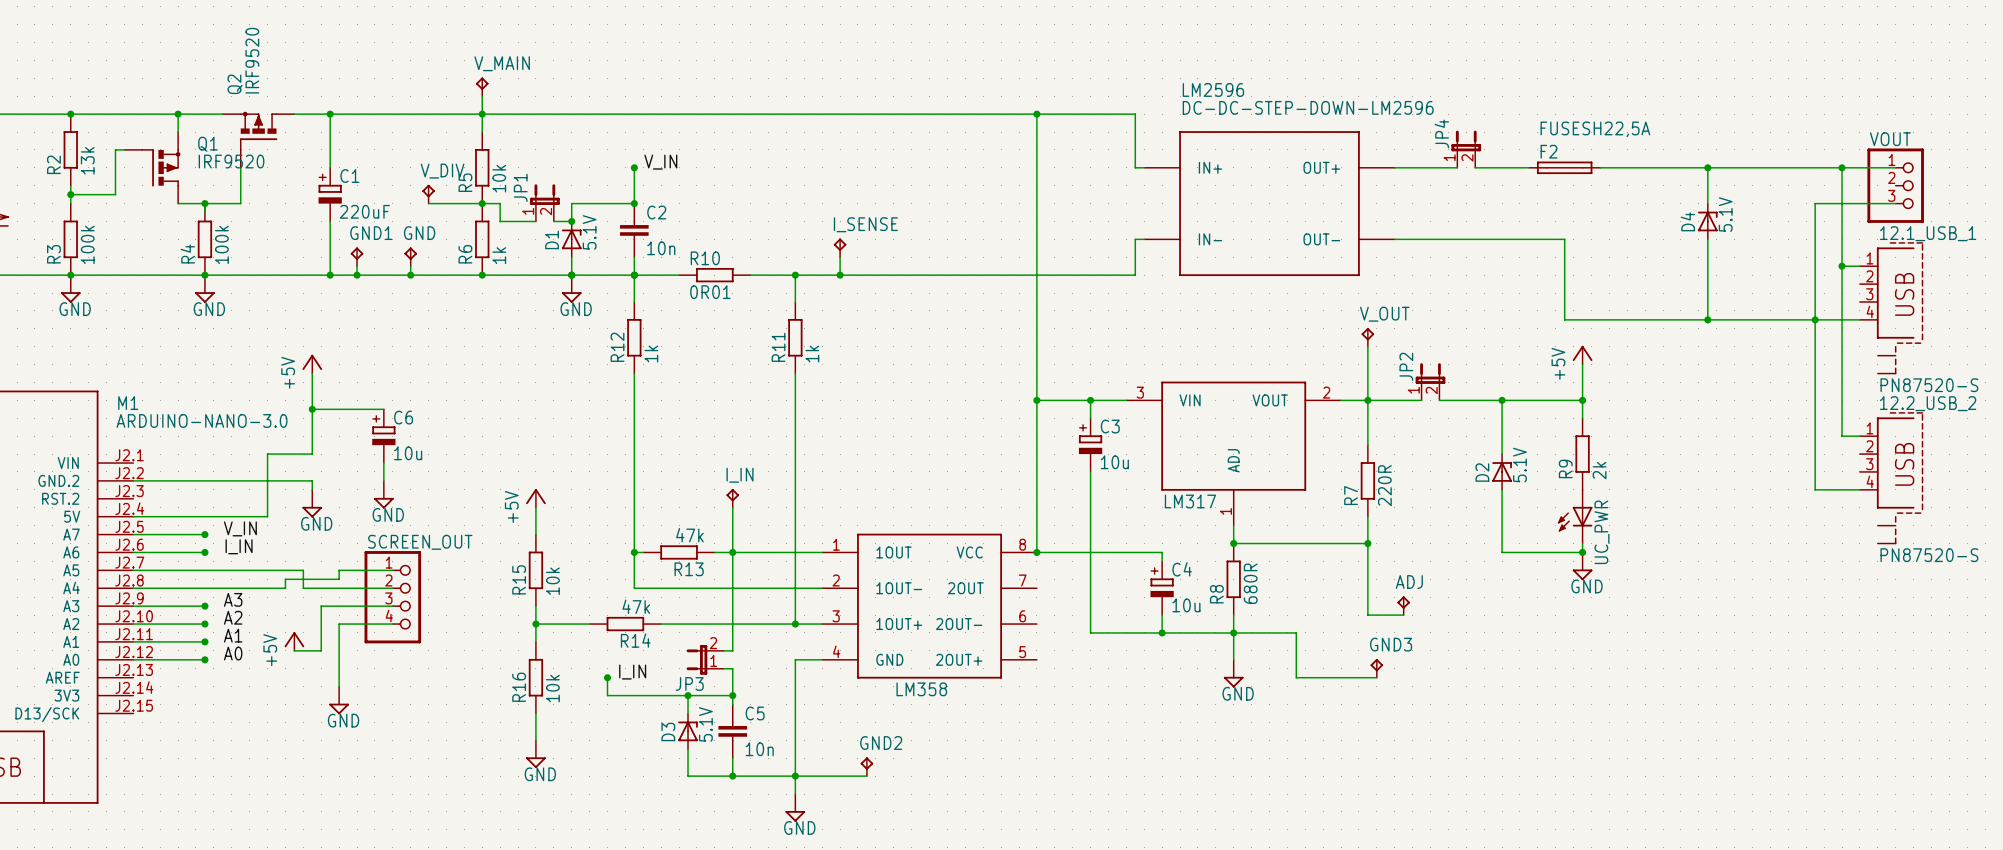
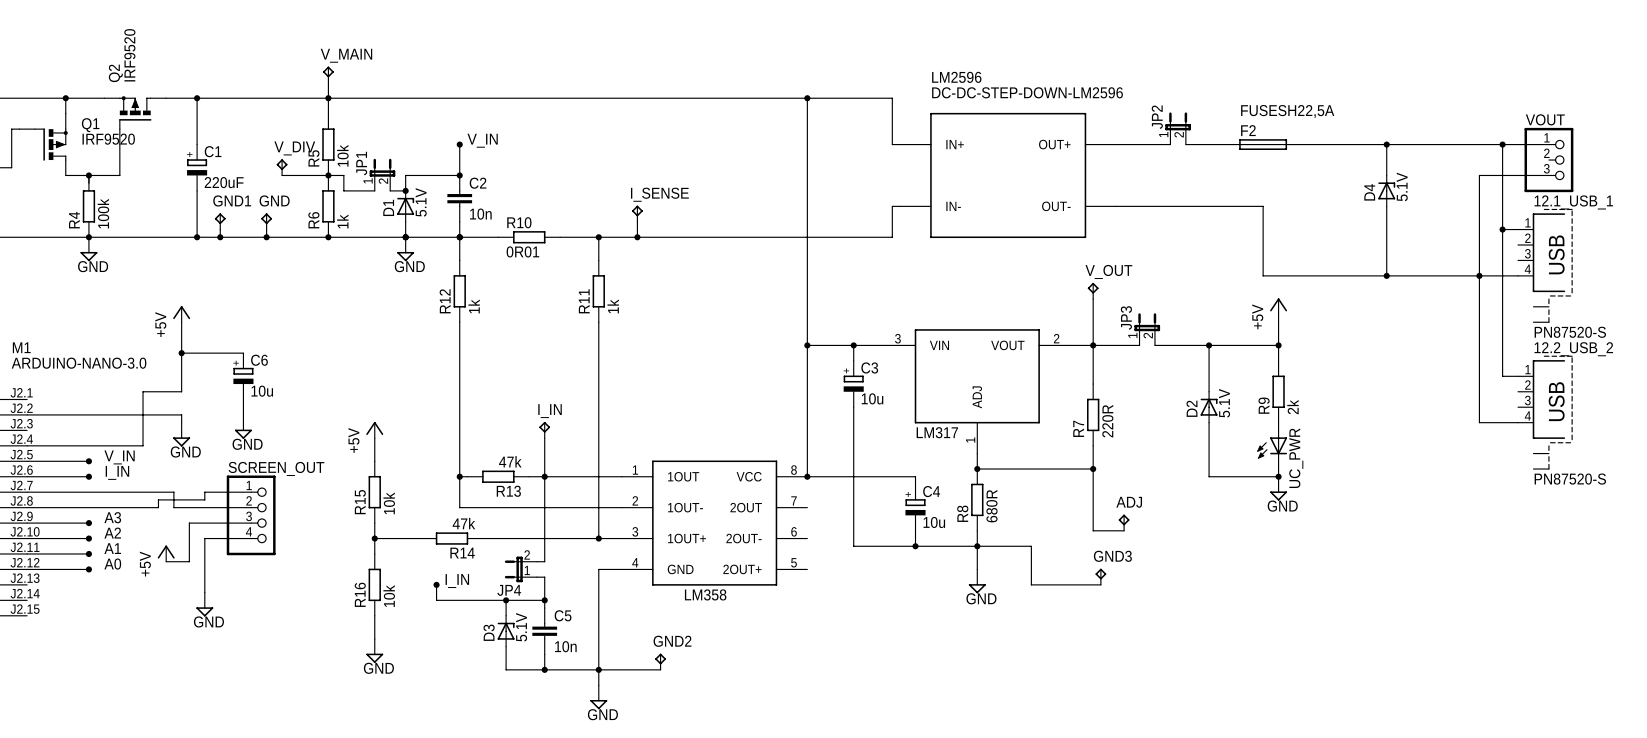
JP4 name: JP4 (1441, 133) -> JP2 (1157, 117)
JP2 name: JP2 (1406, 366) -> JP3 (1126, 317)
JP3 name: JP3 (689, 683) -> JP4 (509, 590)

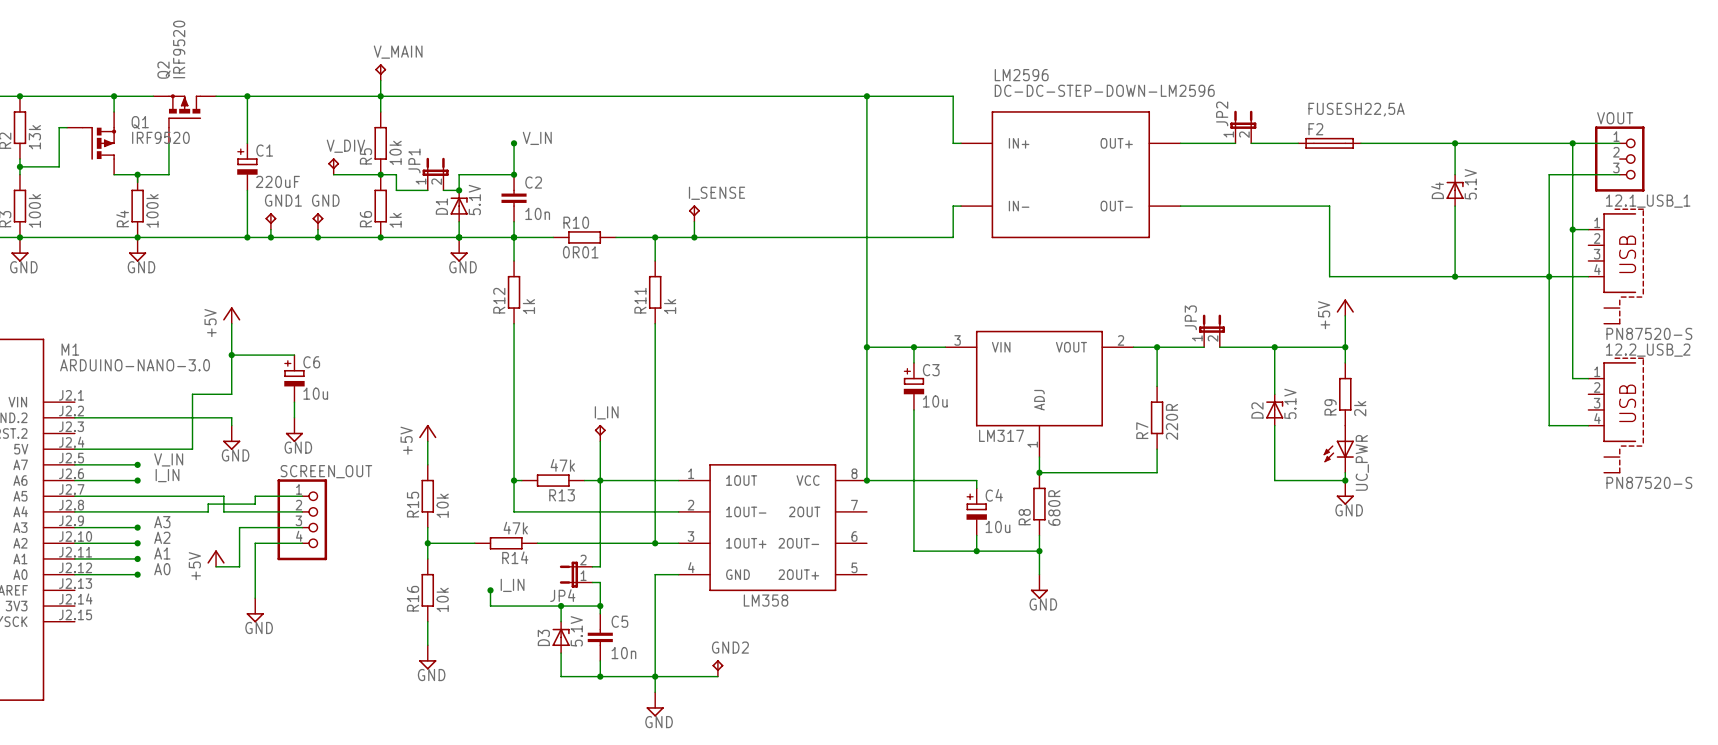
V_OUT: (1093, 290) -> none
wire: (1093, 299) (1093, 345) -> none
wire: (1093, 469) (1093, 530) (1124, 530) -> none
junction: (1093, 469) -> none
ADJ: (1124, 522) -> none
wire: (977, 546) (1031, 546) (1031, 584) (1100, 584) -> none
GND3: (1100, 576) -> none

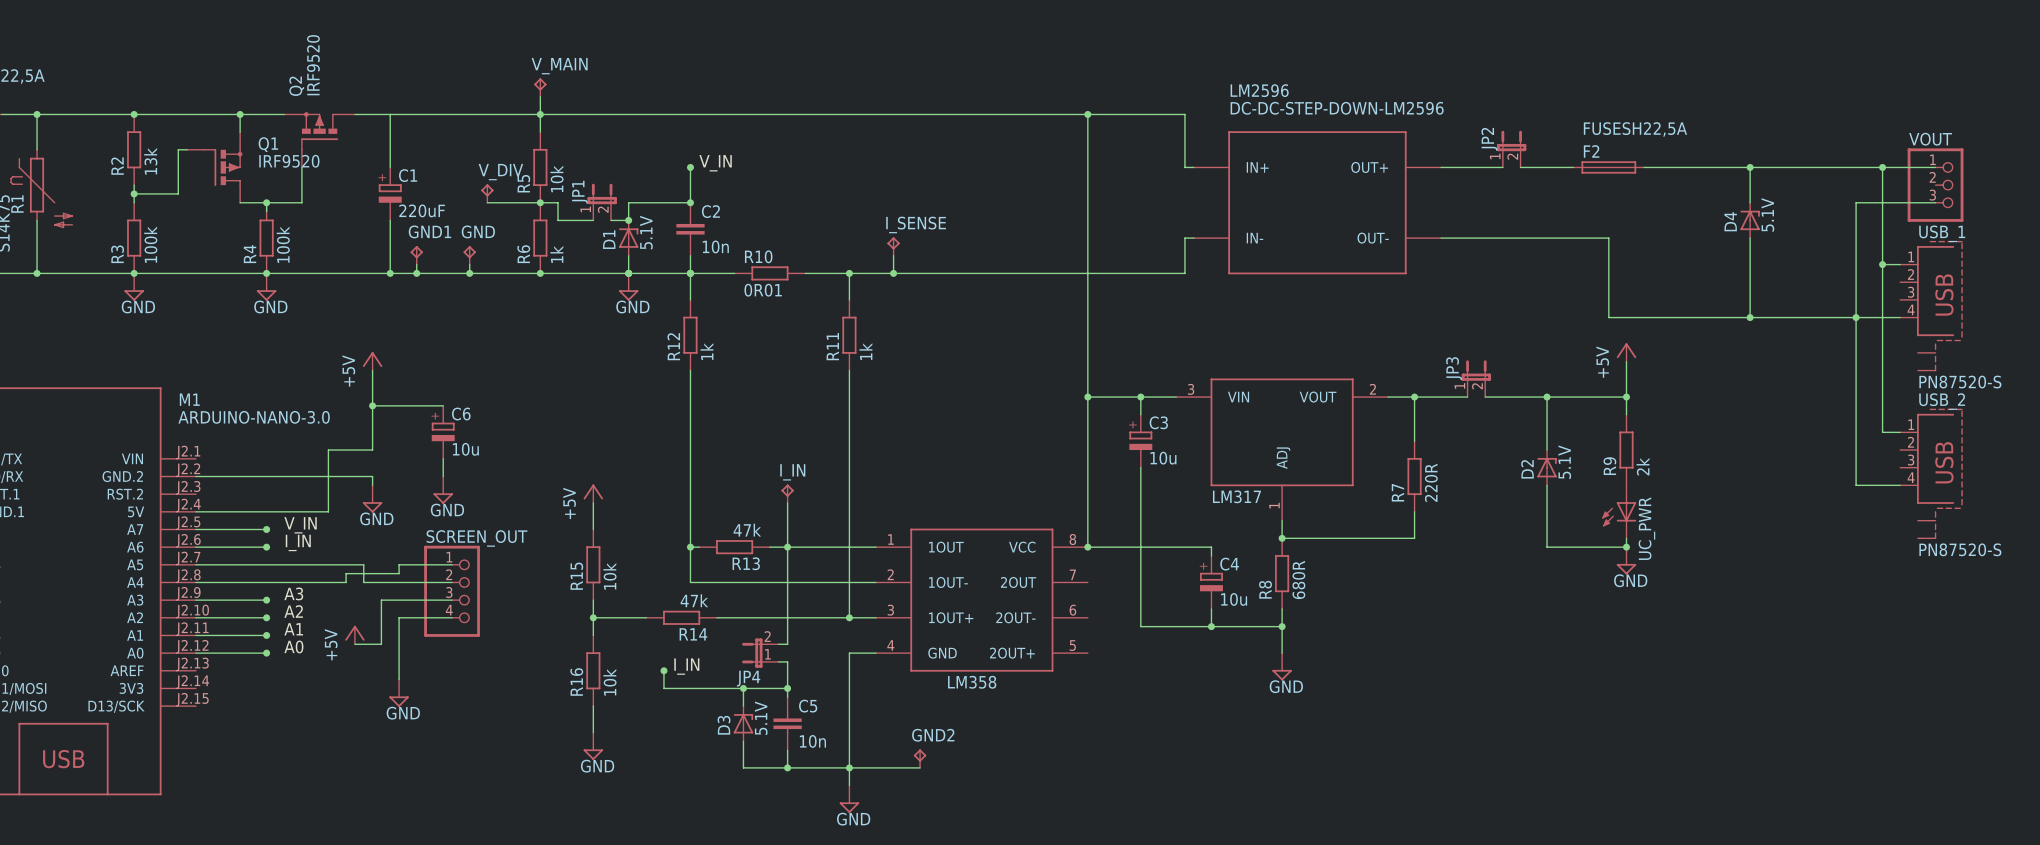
junction: (247, 96) -> none
12.1_USB_1 name: 12.1_USB_1 (1648, 201) -> USB_1 (1942, 233)
12.2_USB_2 name: 12.2_USB_2 (1648, 350) -> USB_2 (1942, 401)

